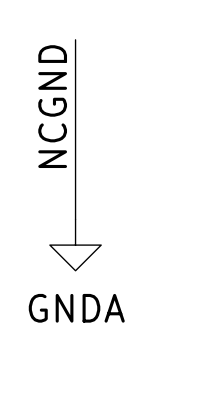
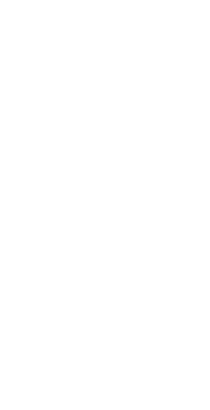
wire: (75, 39) (75, 219) -> none
label: NCGND (52, 106) -> none
power symbol: GNDA (75, 245) -> none

